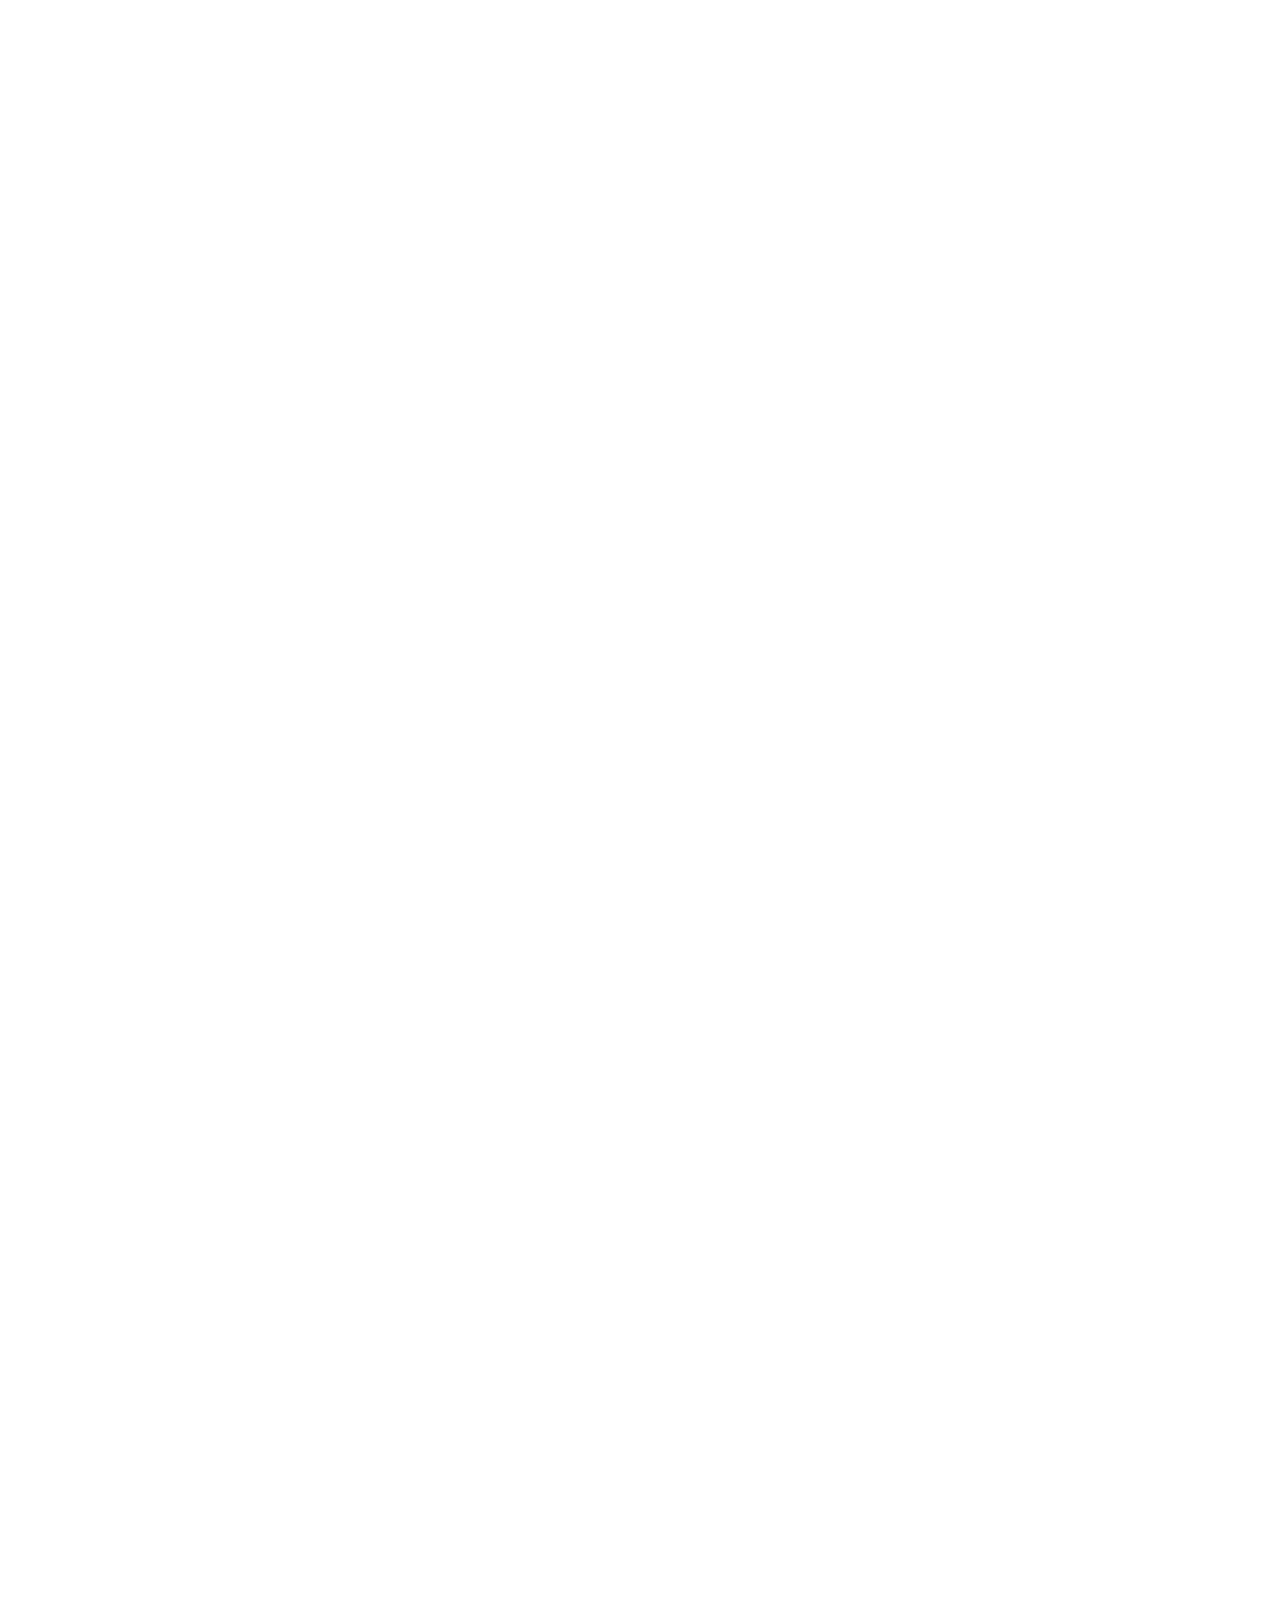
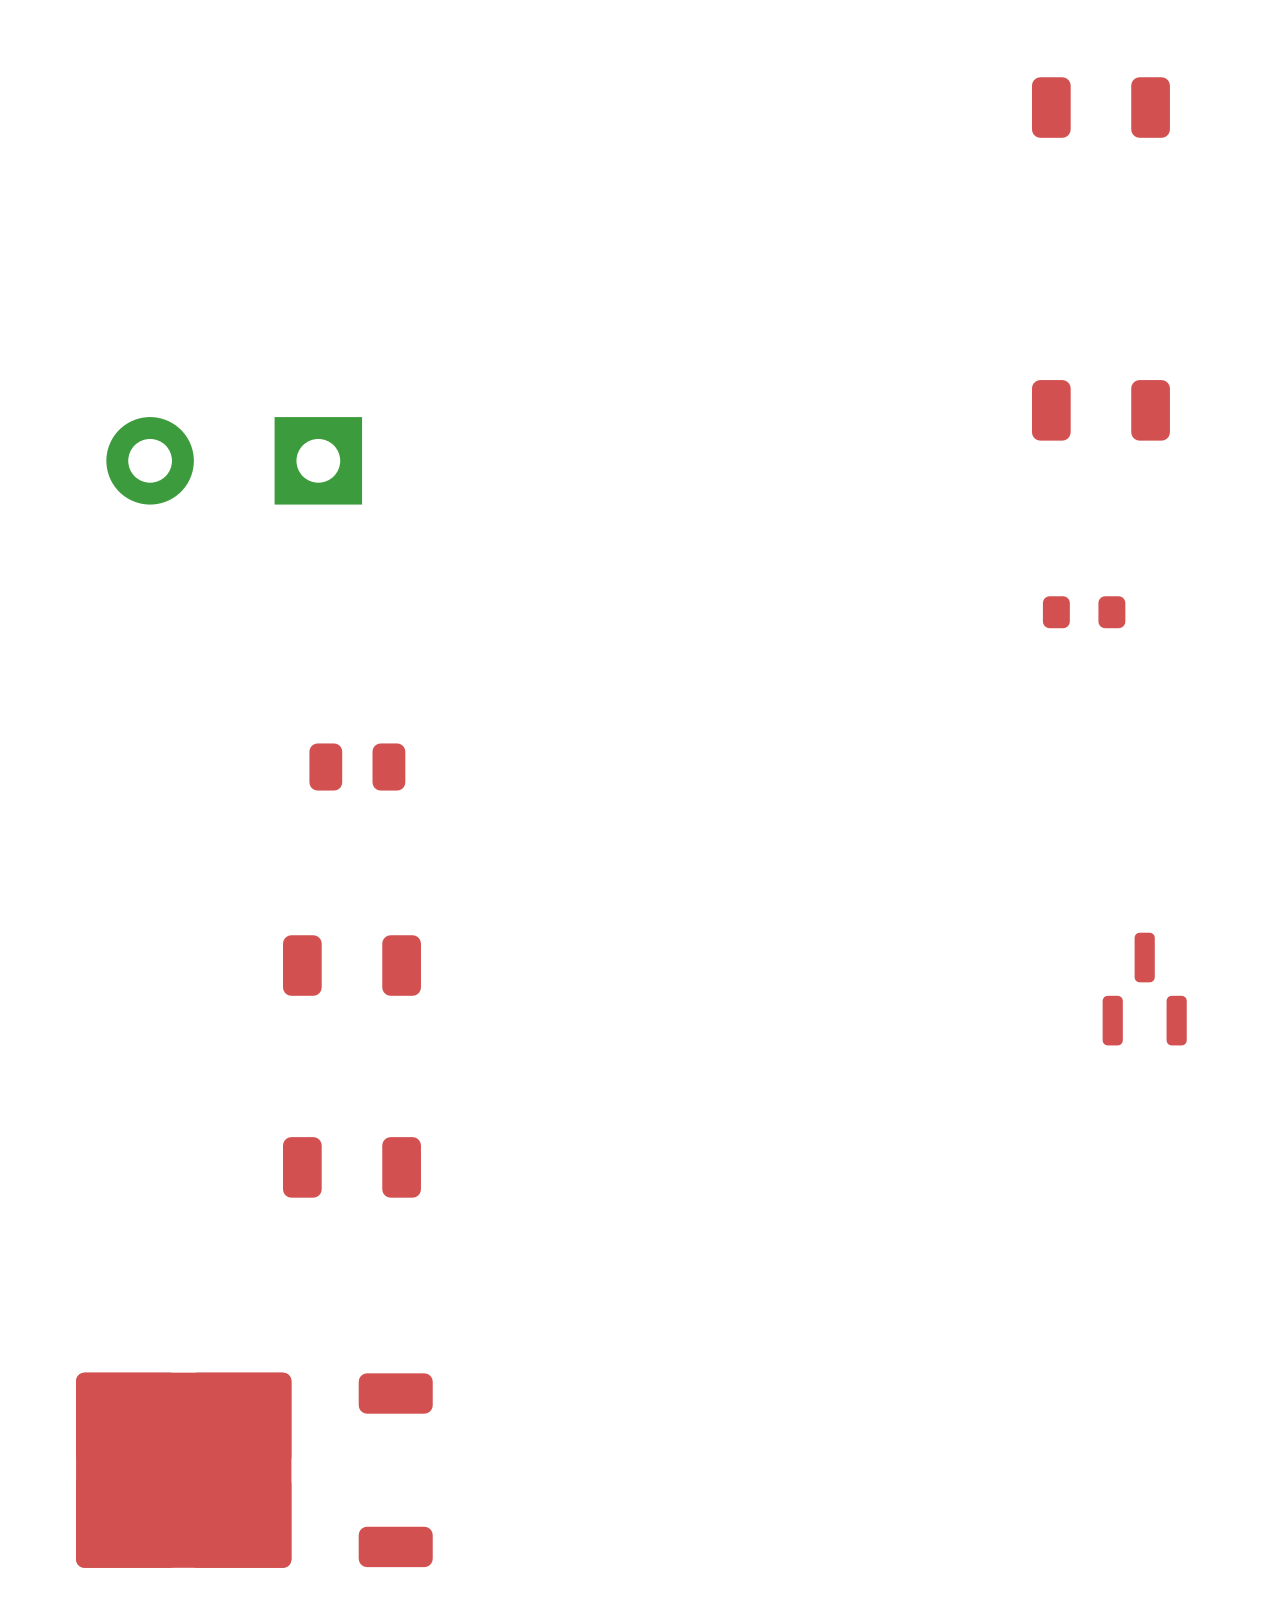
part: none -> (1100, 107)
part: none -> (1100, 410)
part: none -> (234, 460)
part: none -> (1084, 612)
part: none -> (357, 767)
part: none -> (351, 965)
part: none -> (1144, 989)
part: none -> (351, 1167)
part: none -> (254, 1470)

